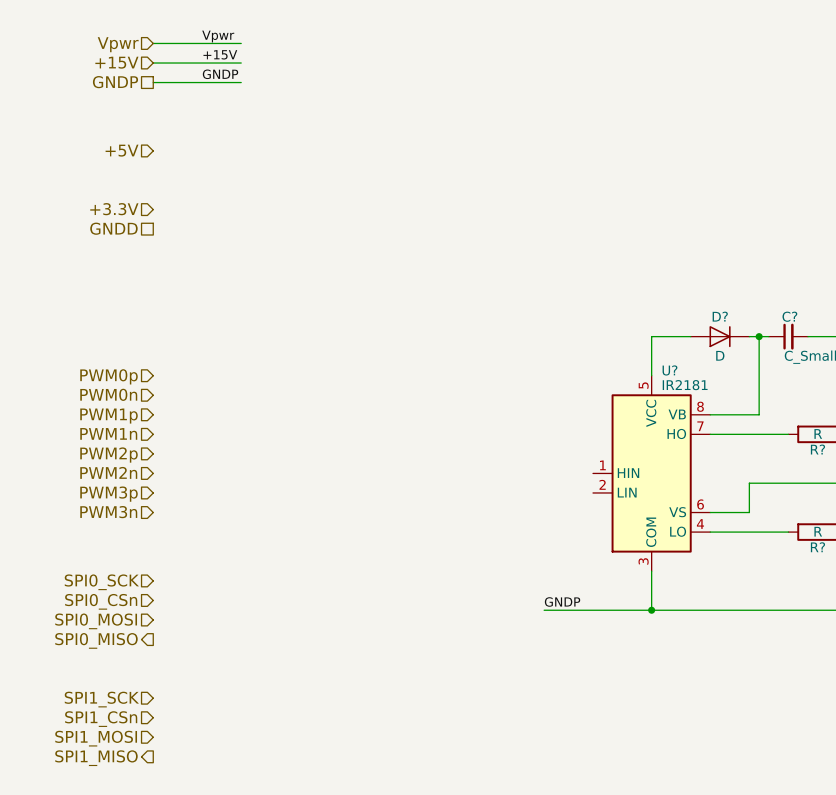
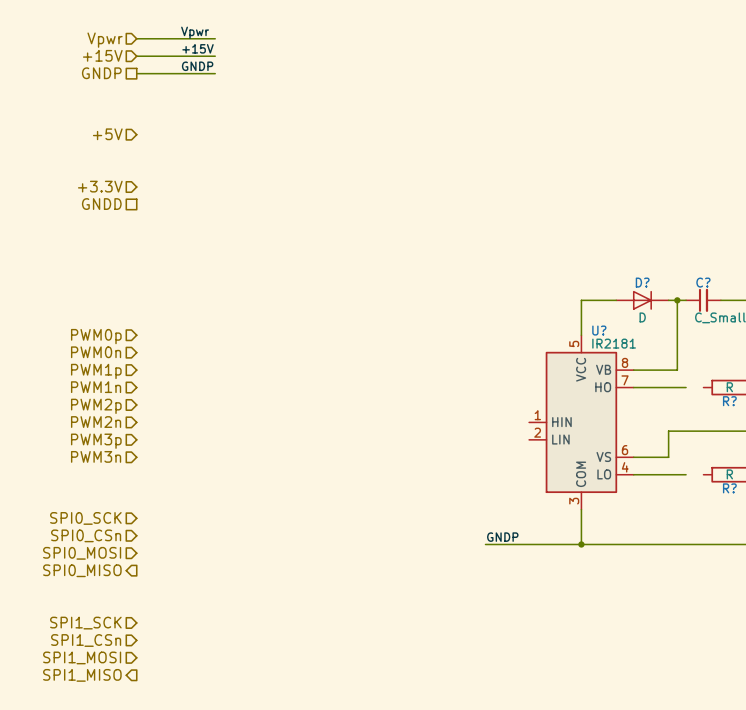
wire: (768, 434) (788, 434) -> none
wire: (768, 532) (788, 532) -> none

